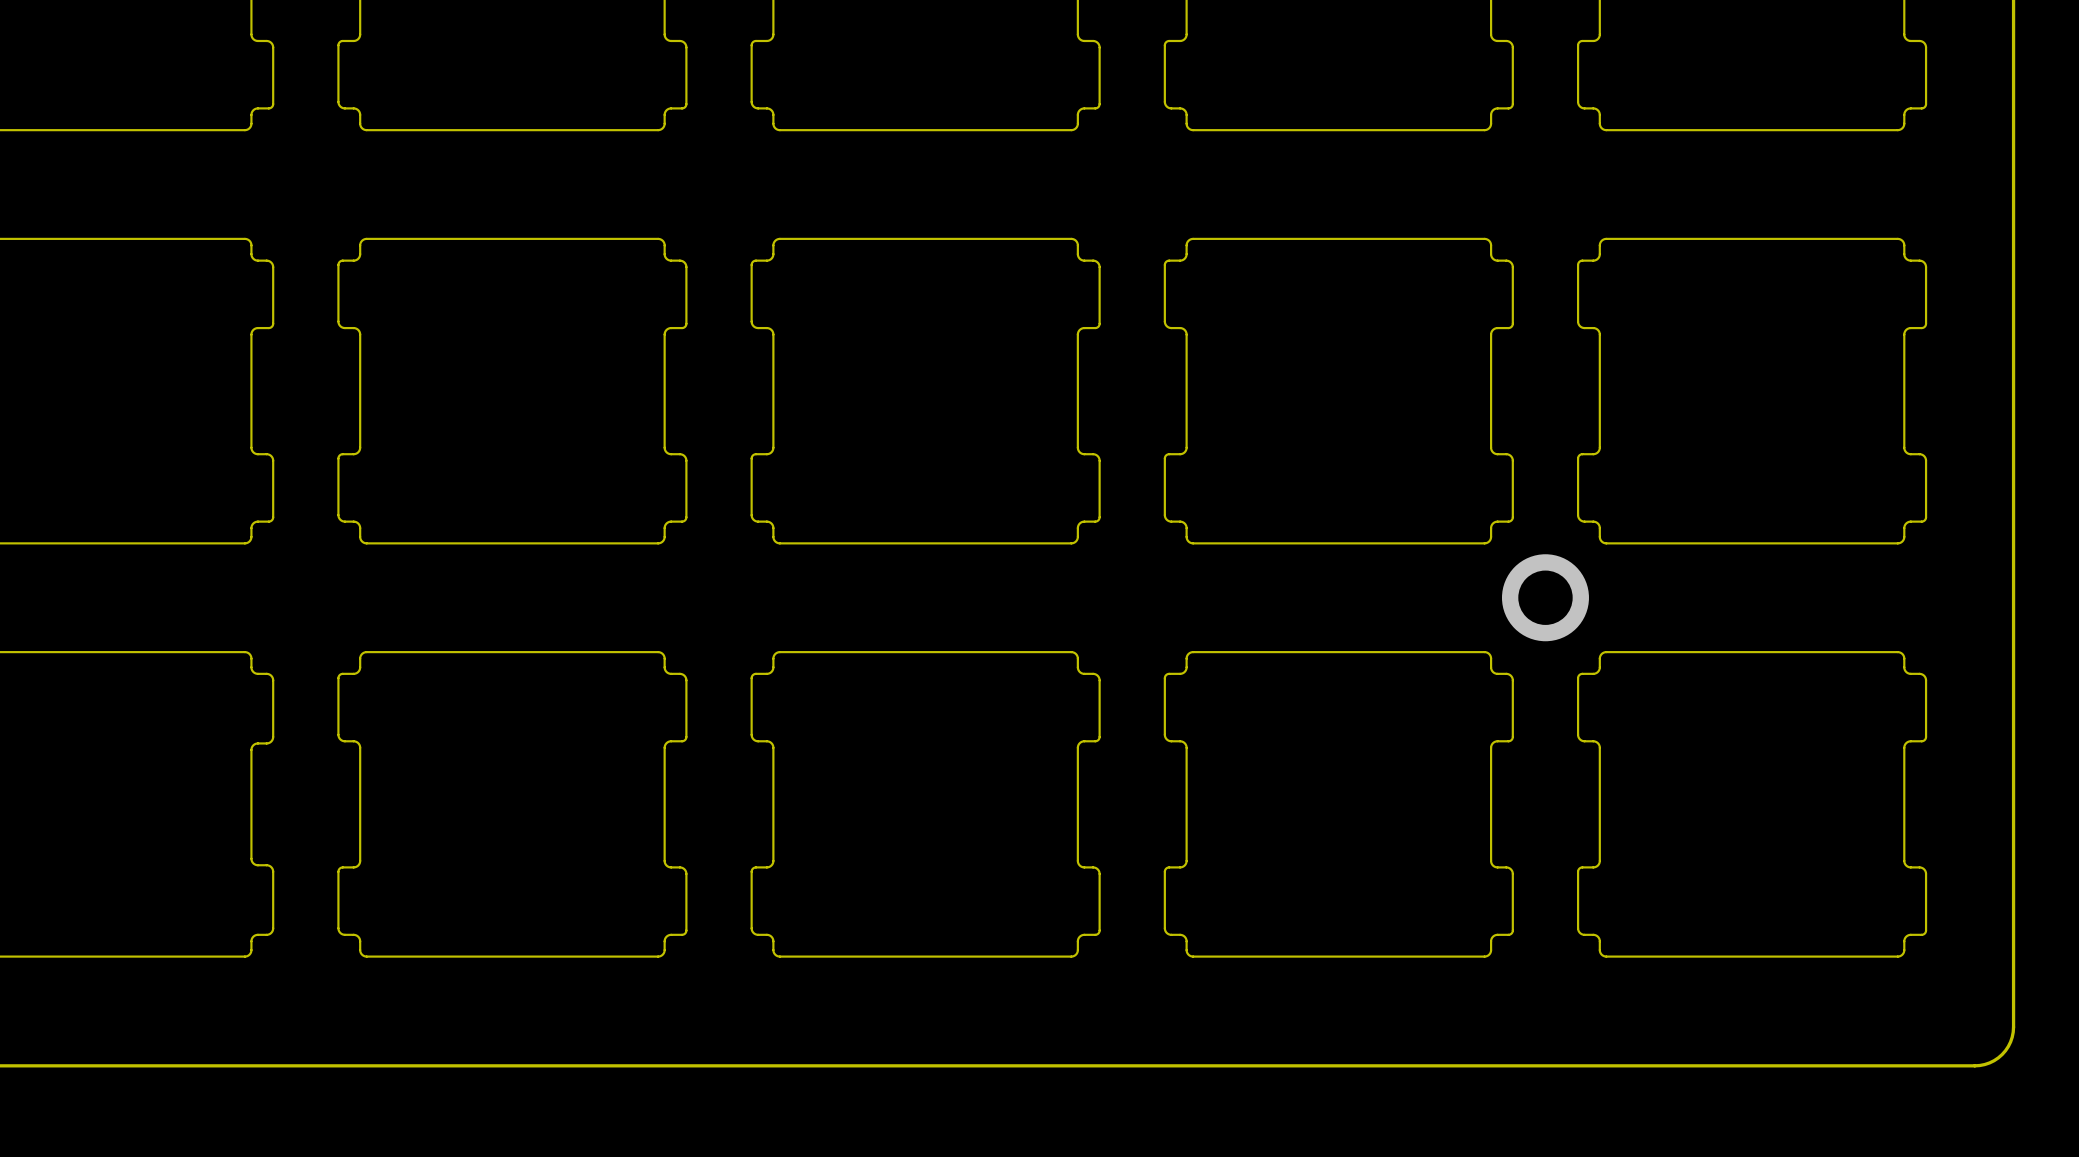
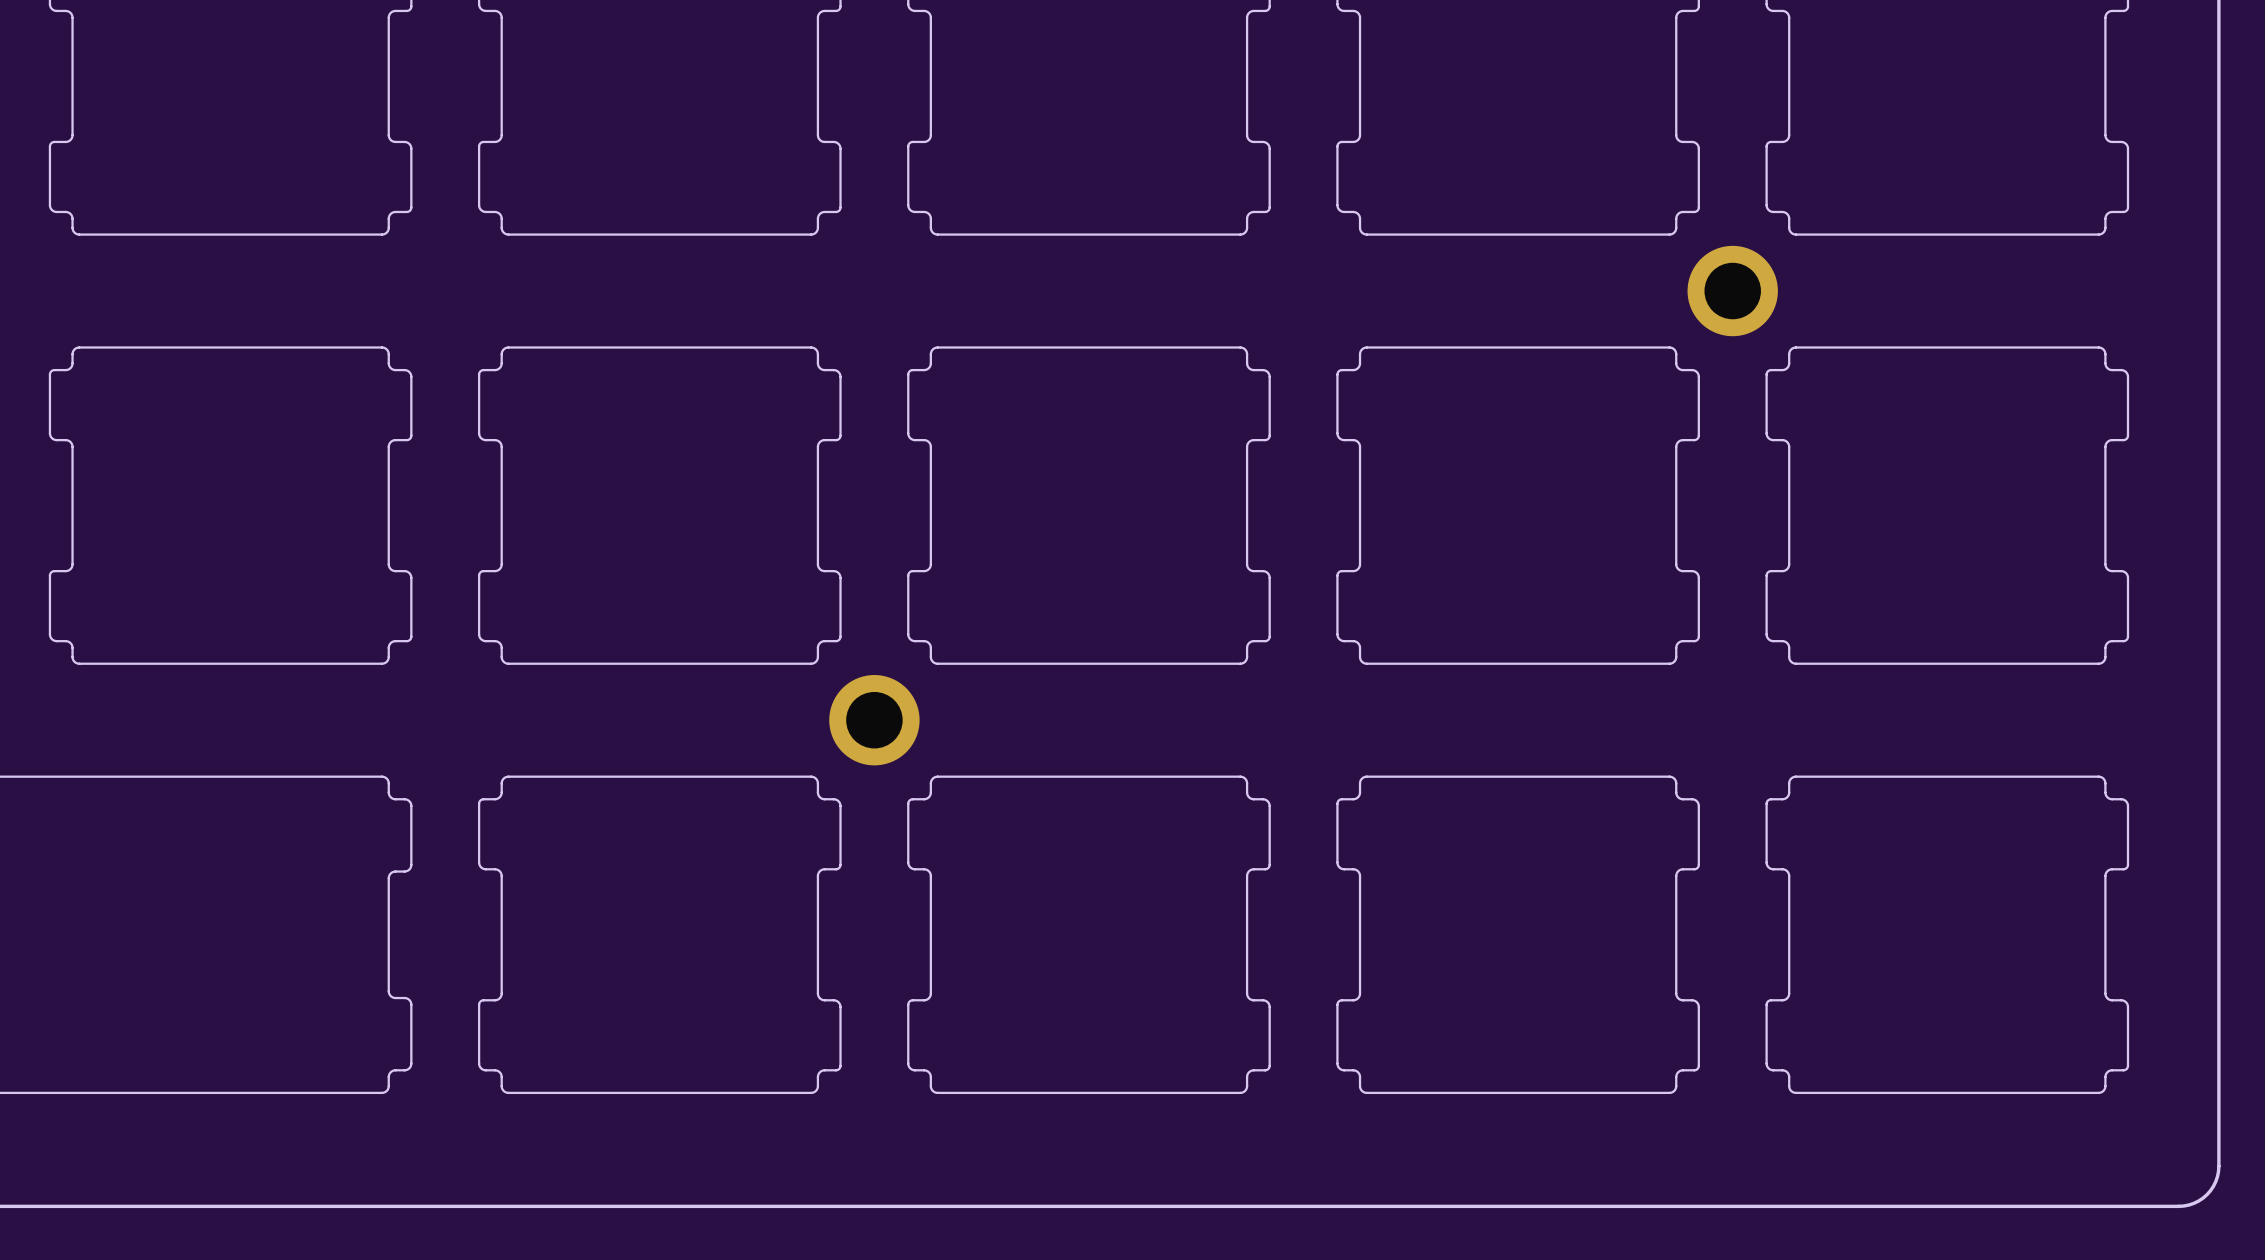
via: none -> (1732, 291)
via: none -> (874, 720)
via: (1545, 597) -> none

